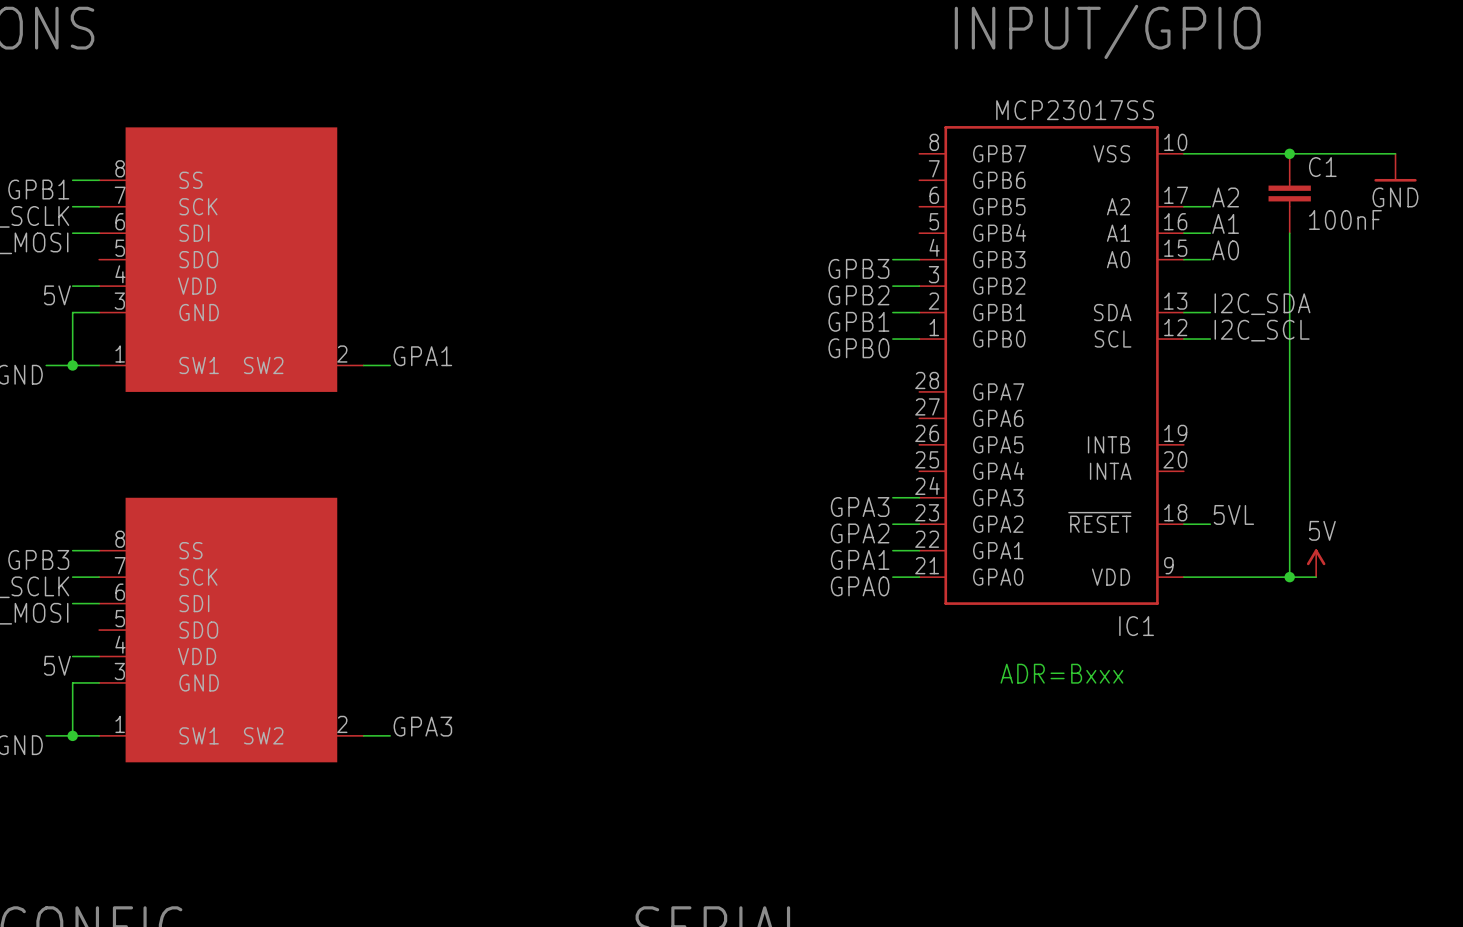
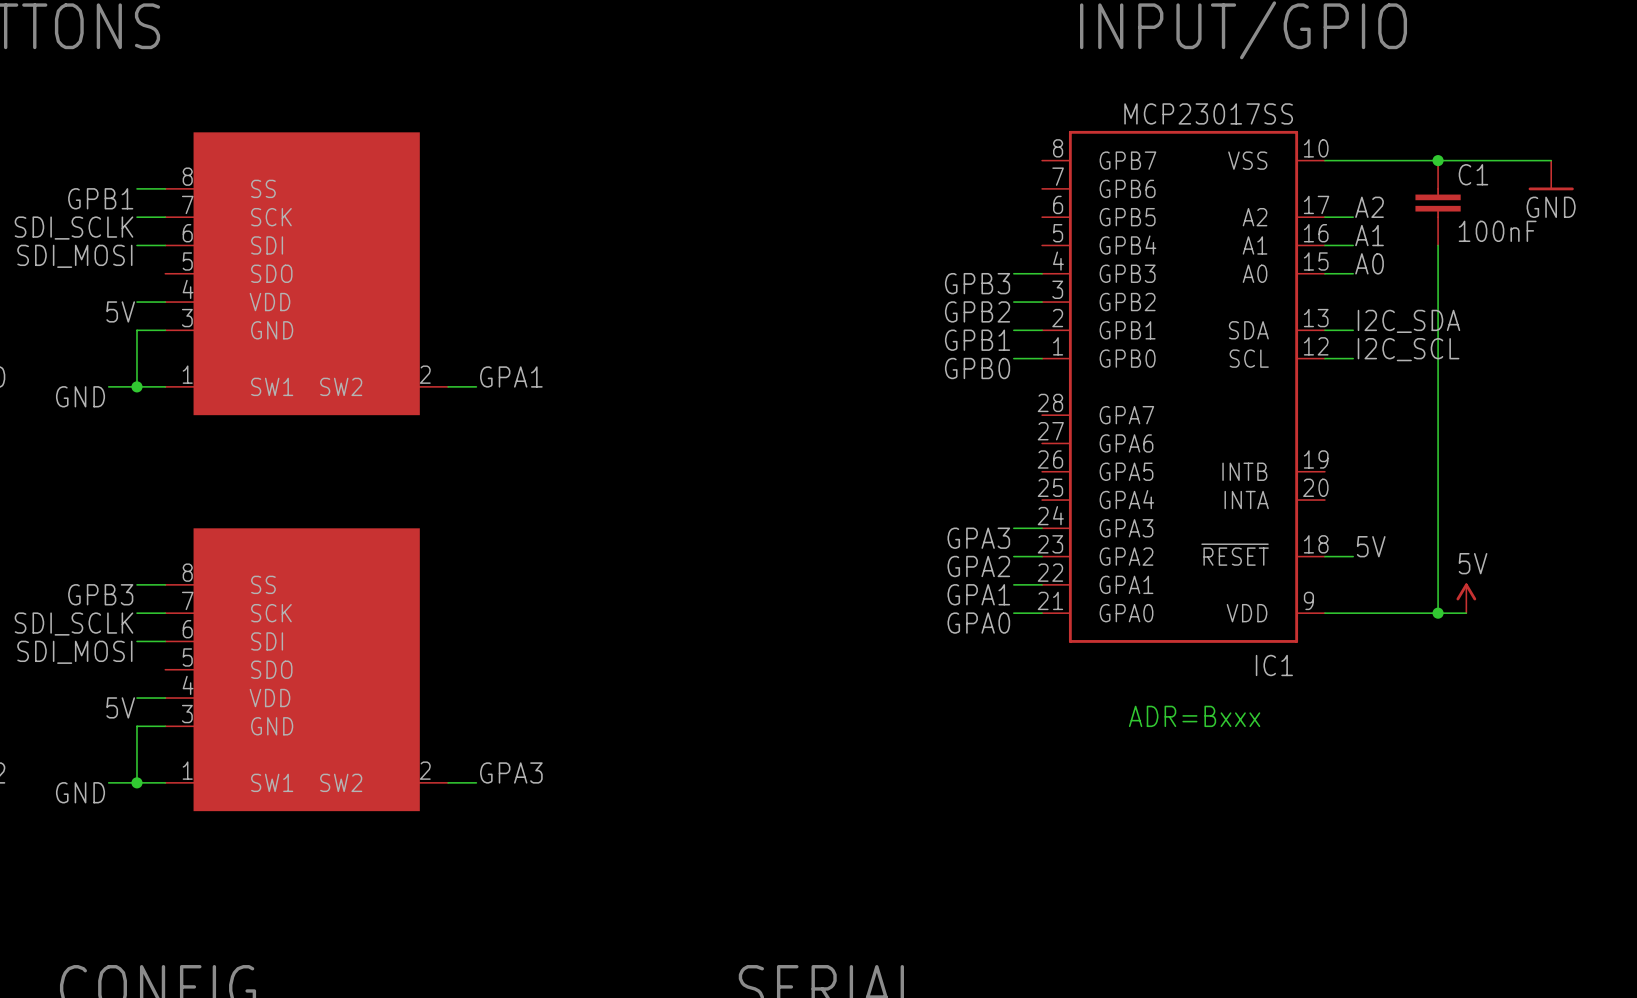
label: 5VL (1233, 514) -> 5V (1371, 546)

